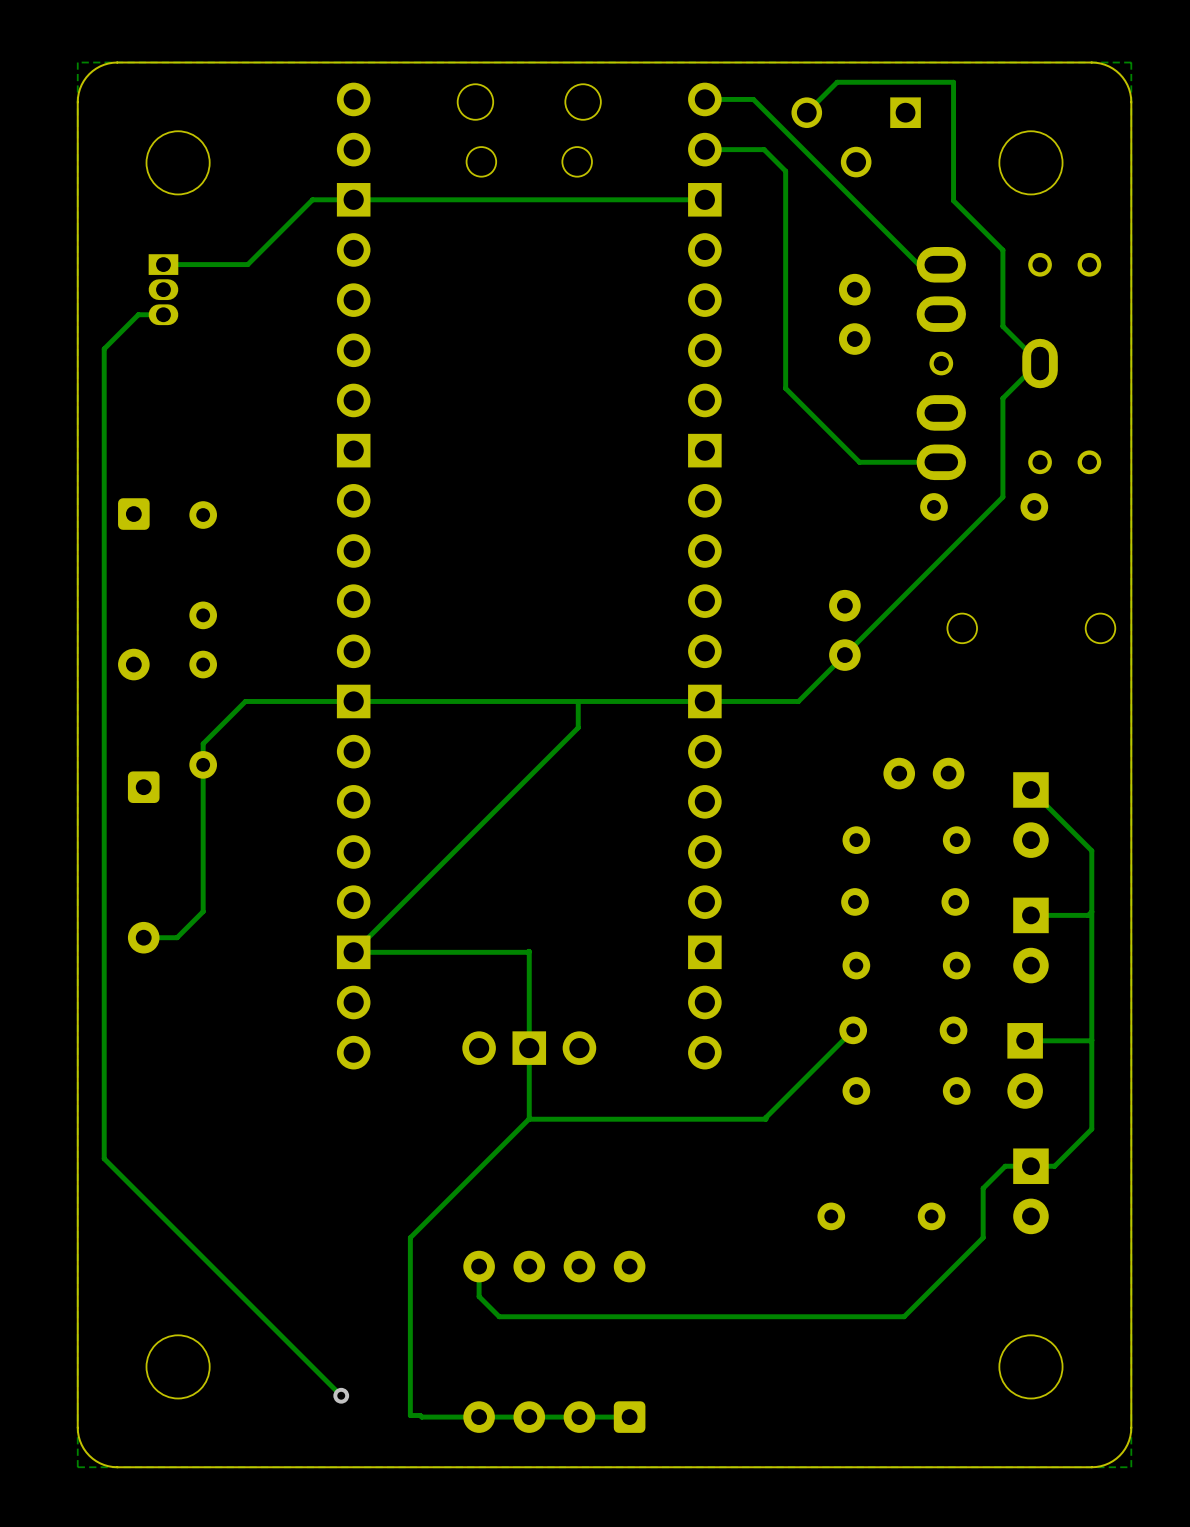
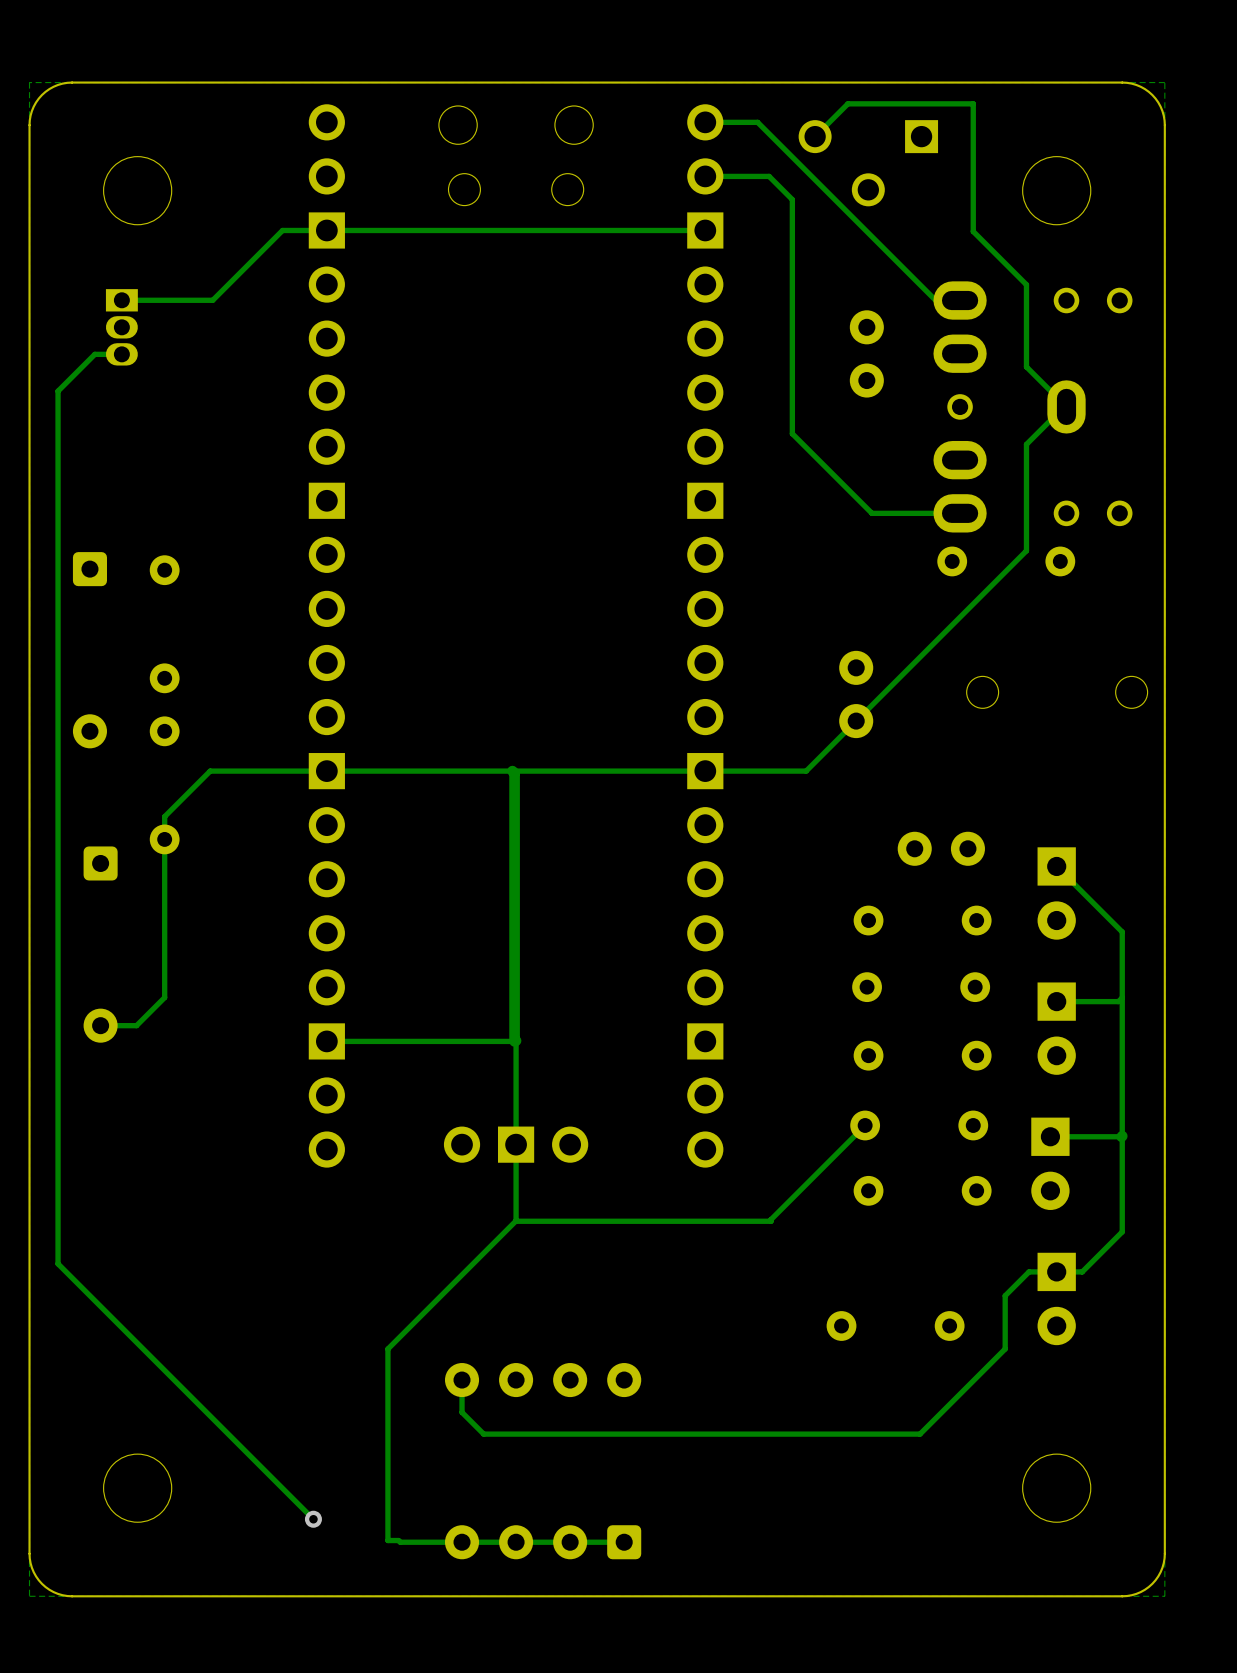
track: none -> (512, 771) (514, 773) (514, 1041)
track: (578, 701) (578, 727) (353, 952) -> none

